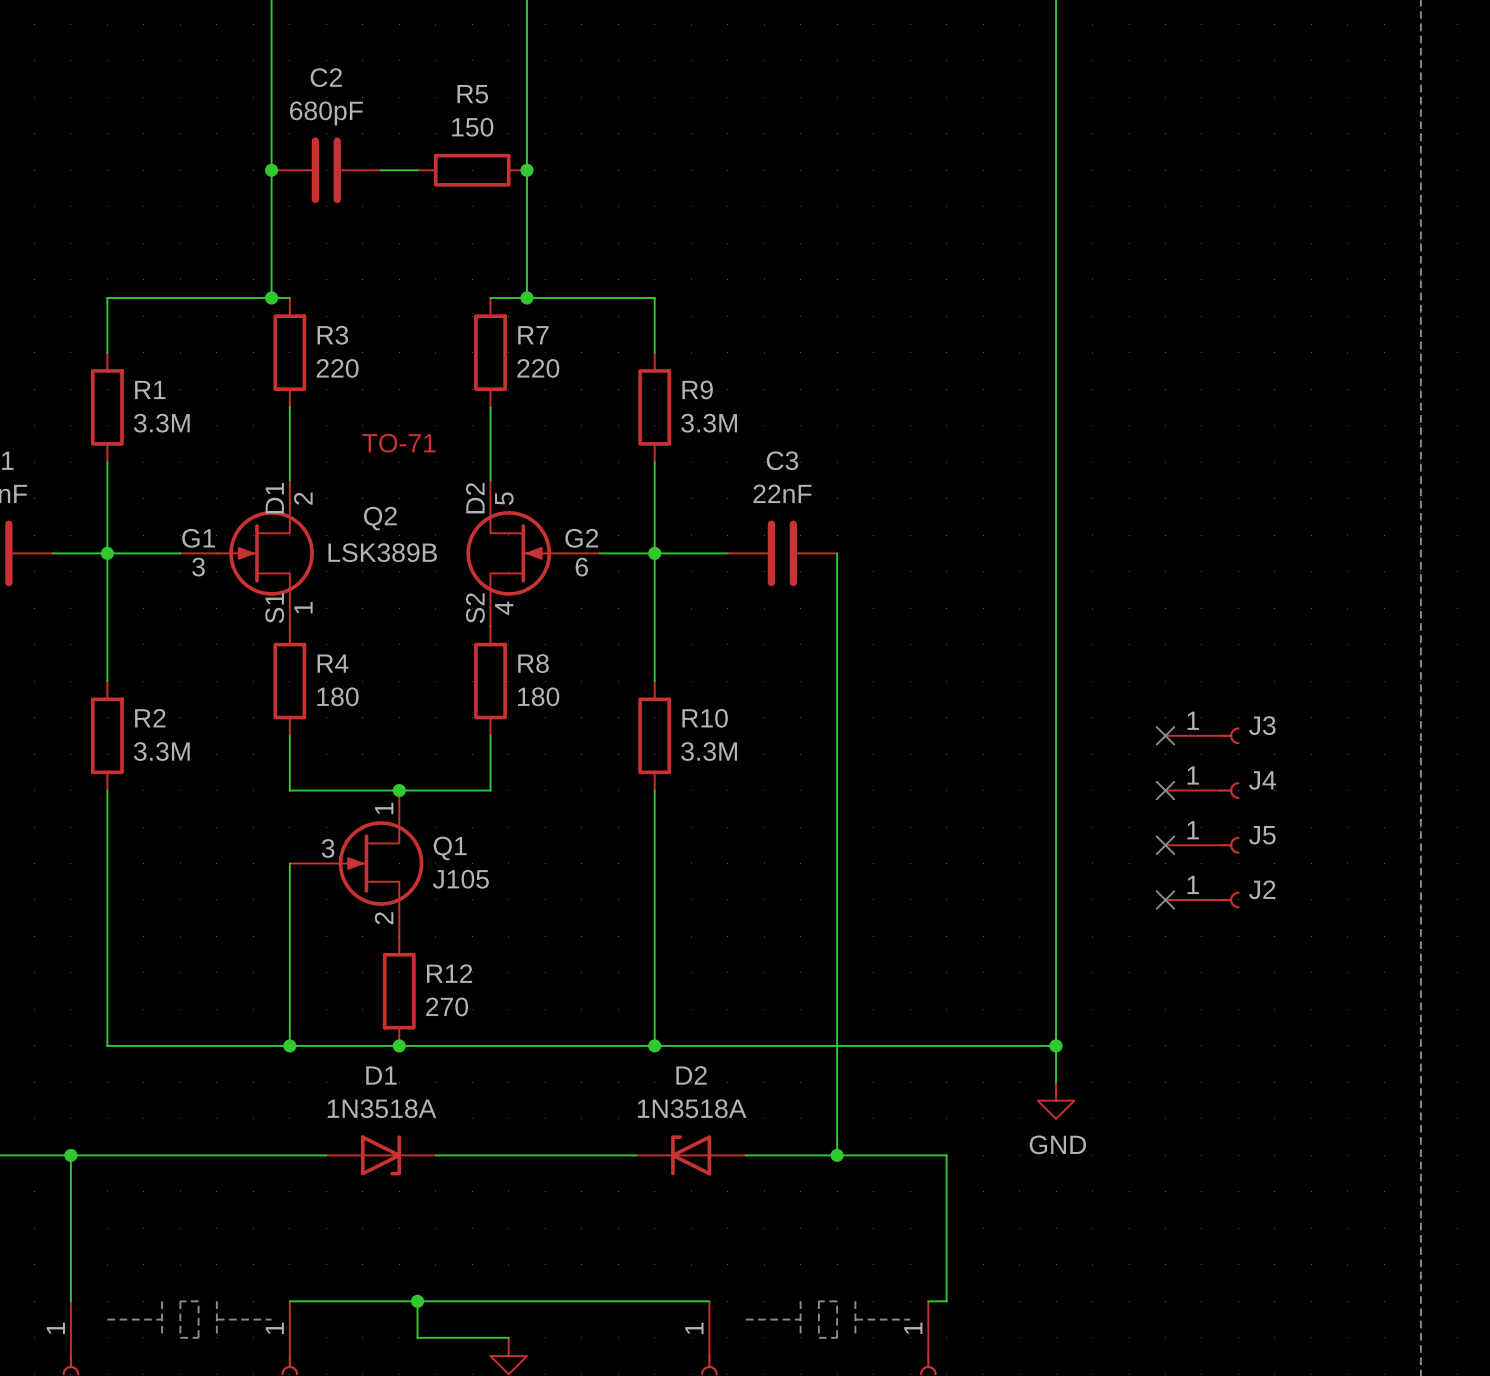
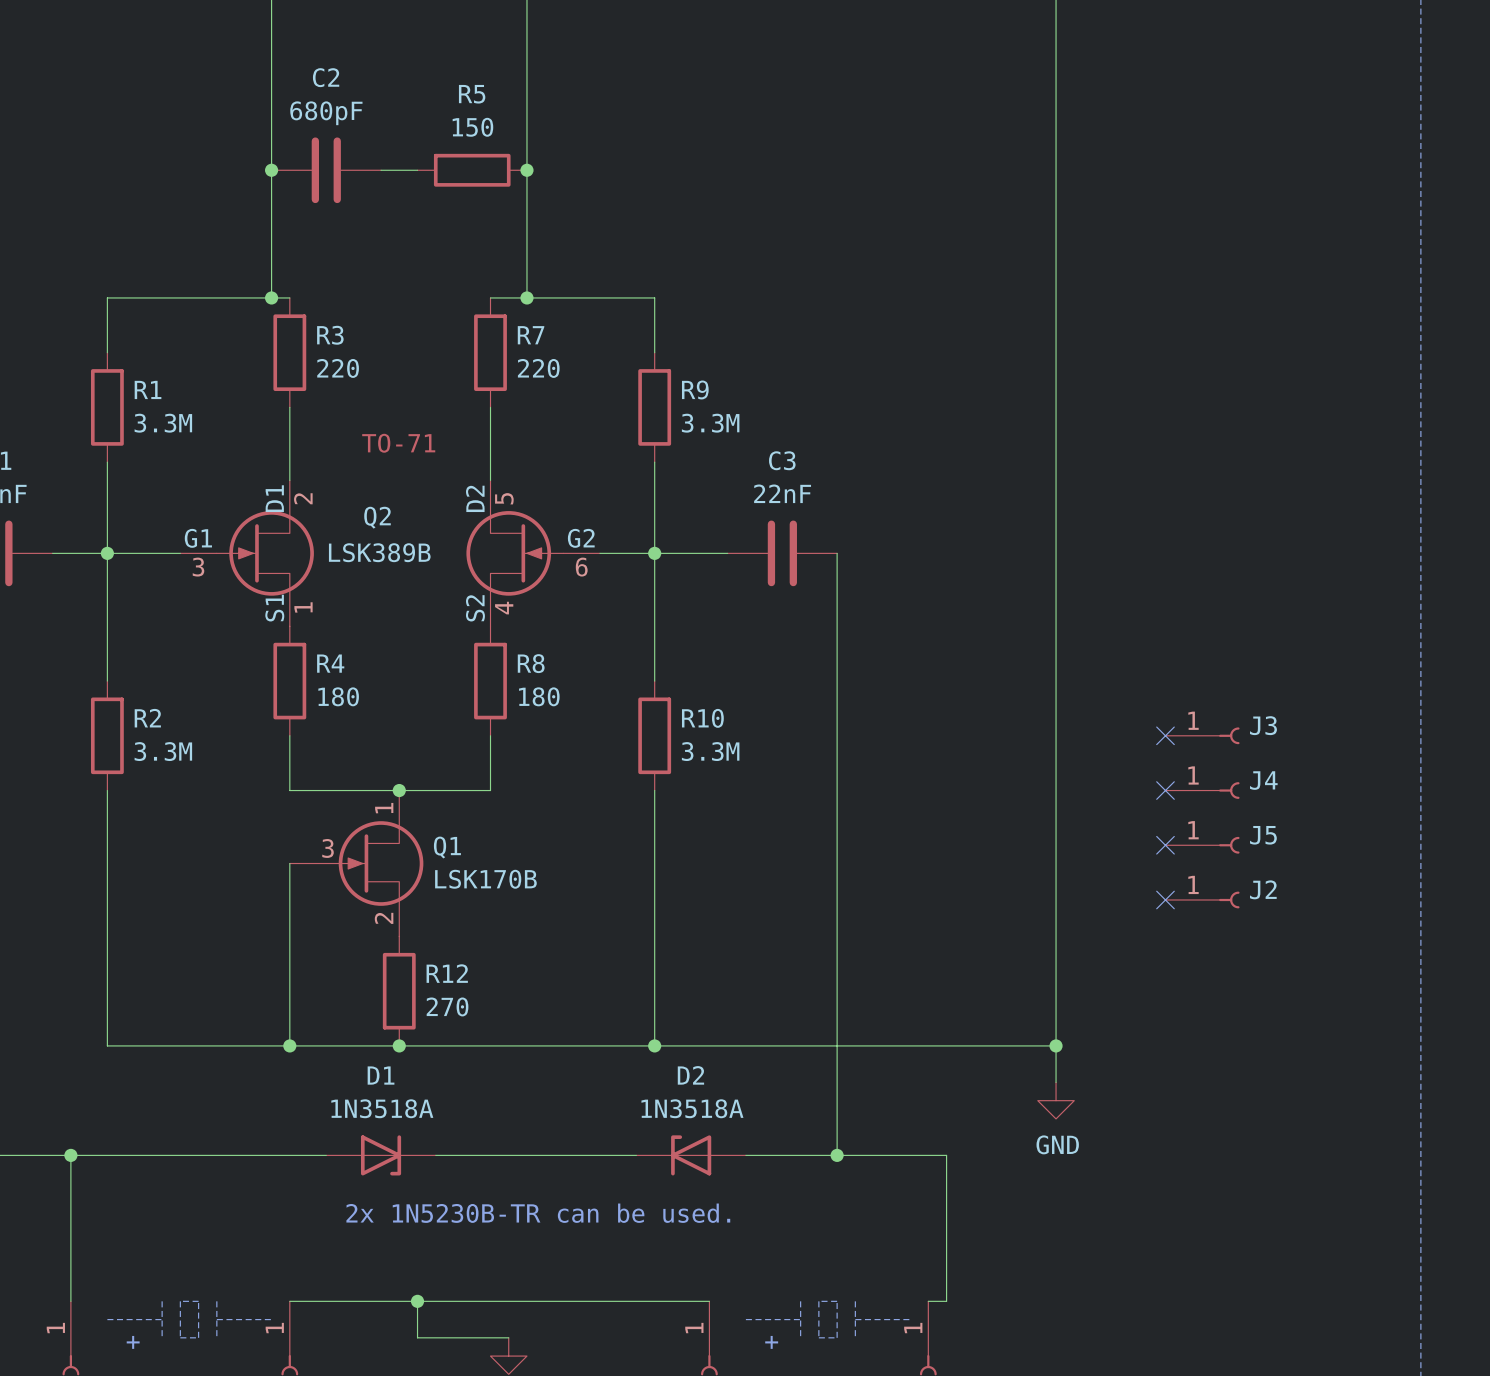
Q1 value: J105 (460, 879) -> LSK170B (485, 879)
text: none -> 2x 1N5230B-TR can be used. (538, 1213)
text: none -> + (133, 1342)
text: none -> + (771, 1342)

